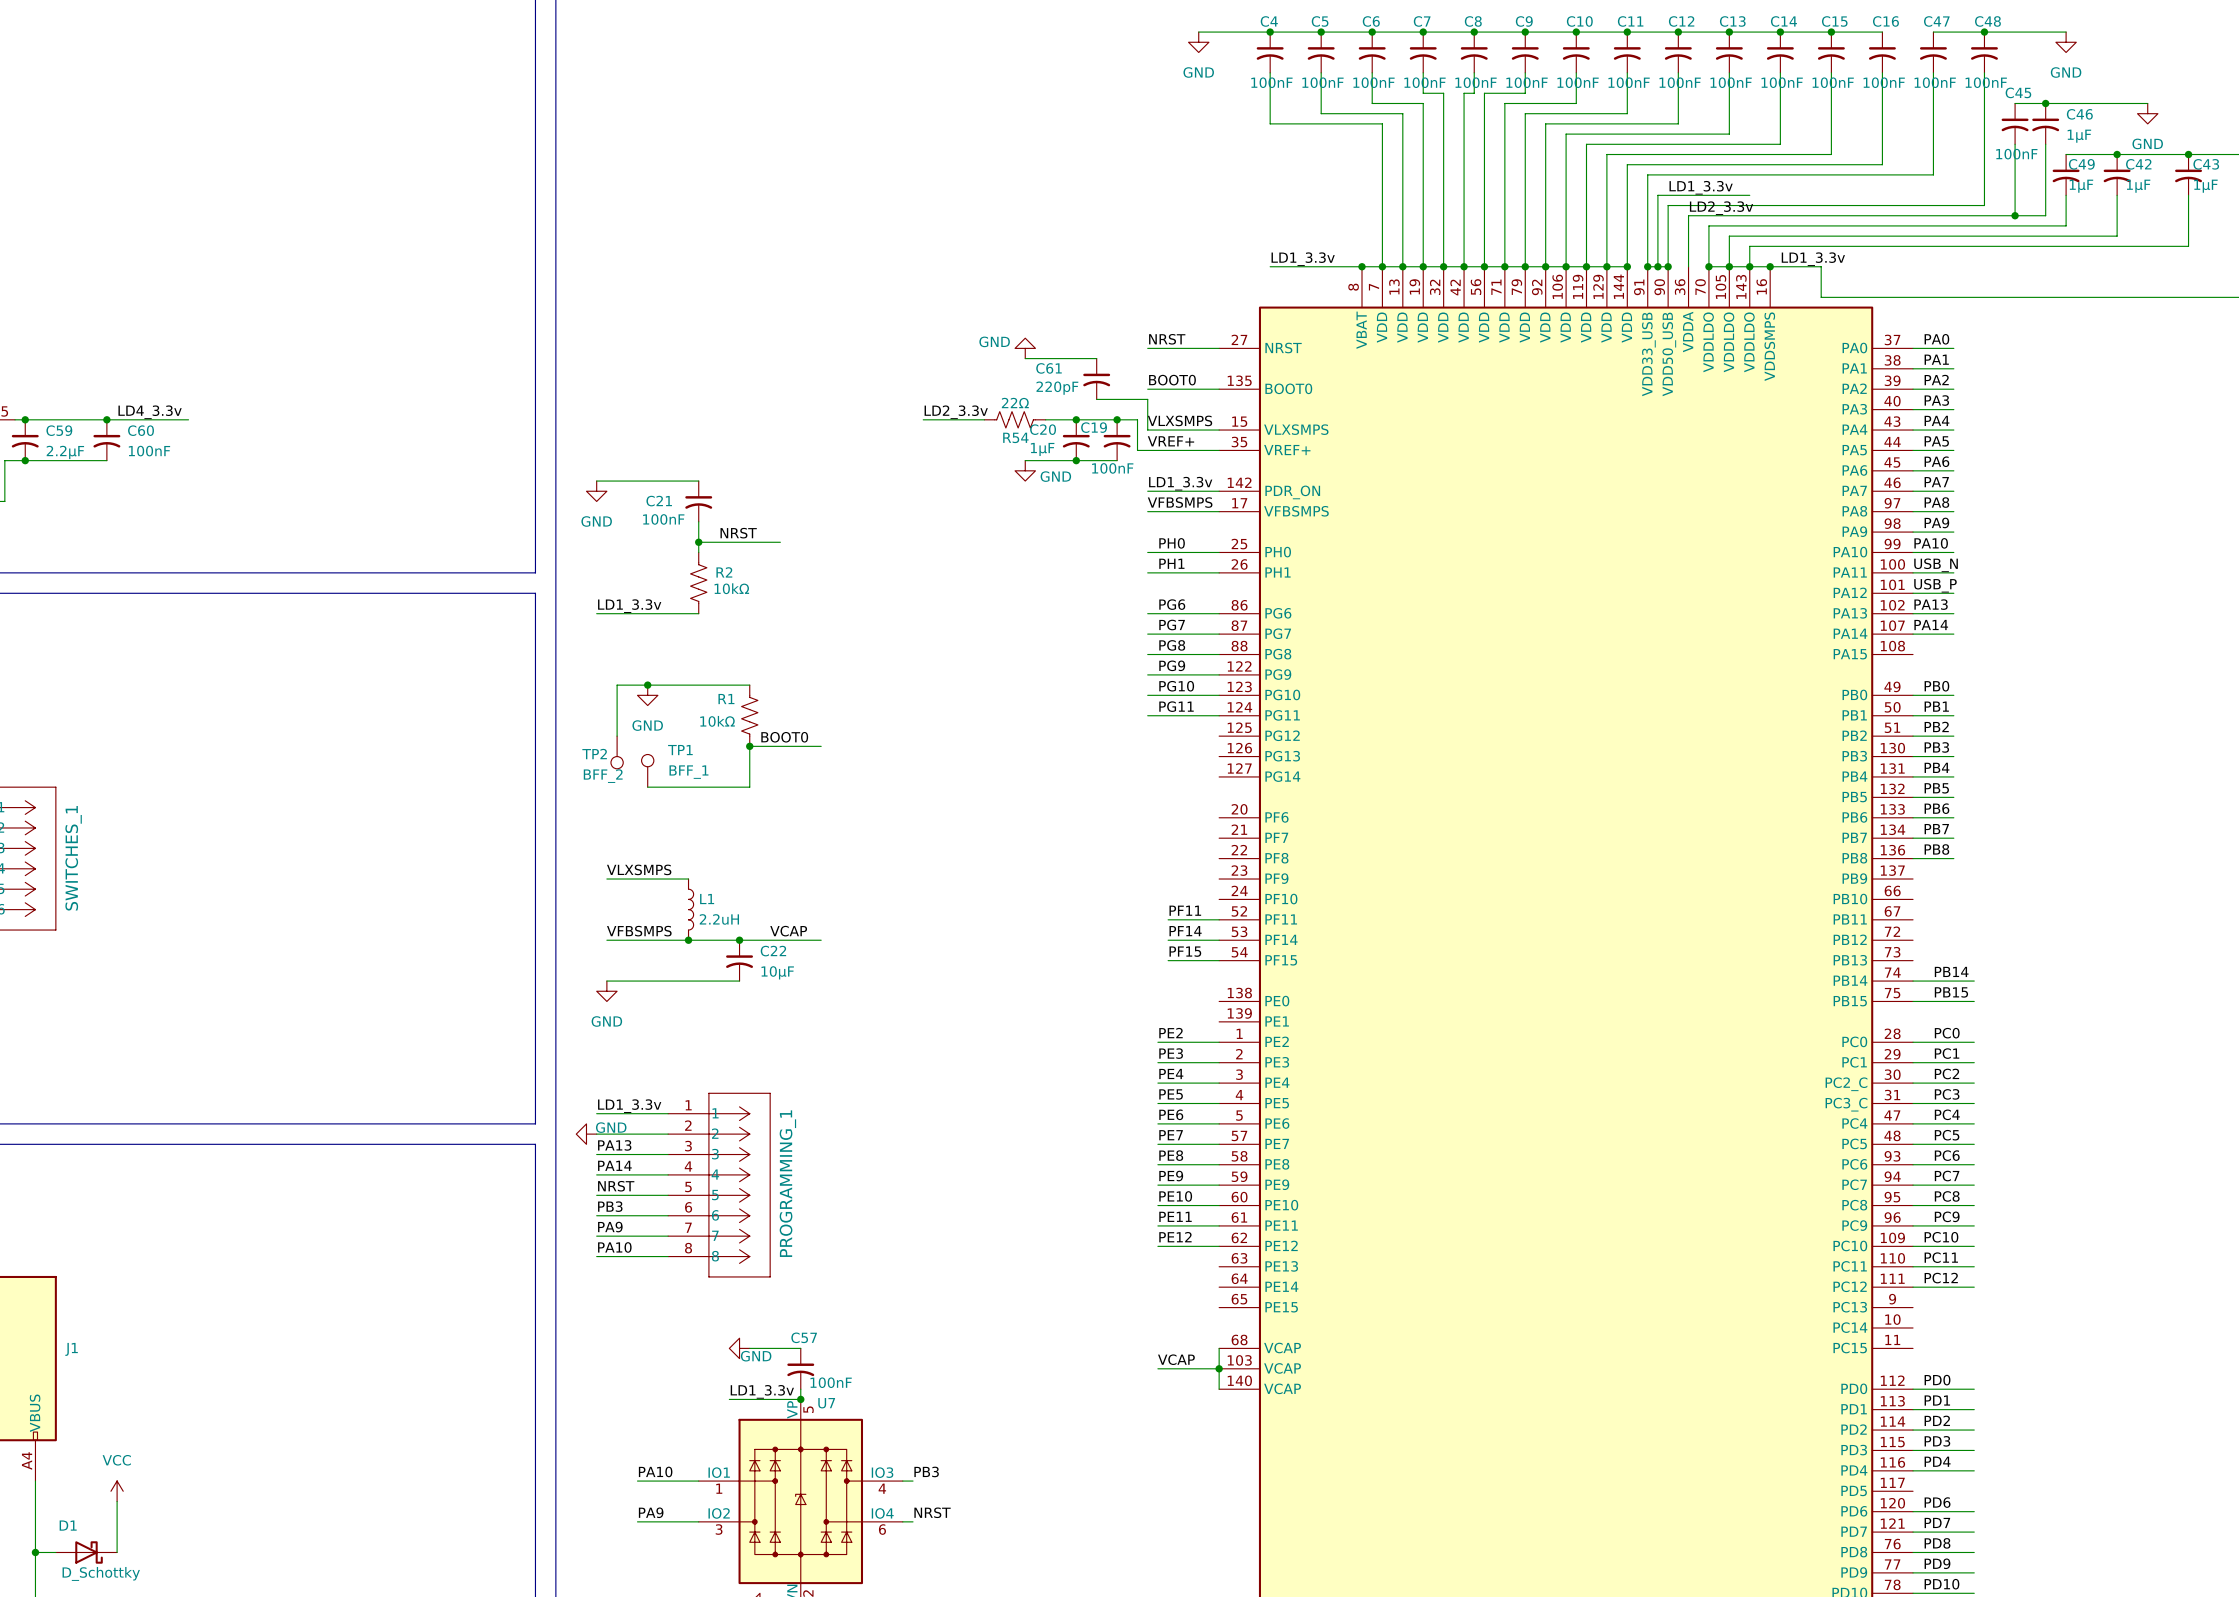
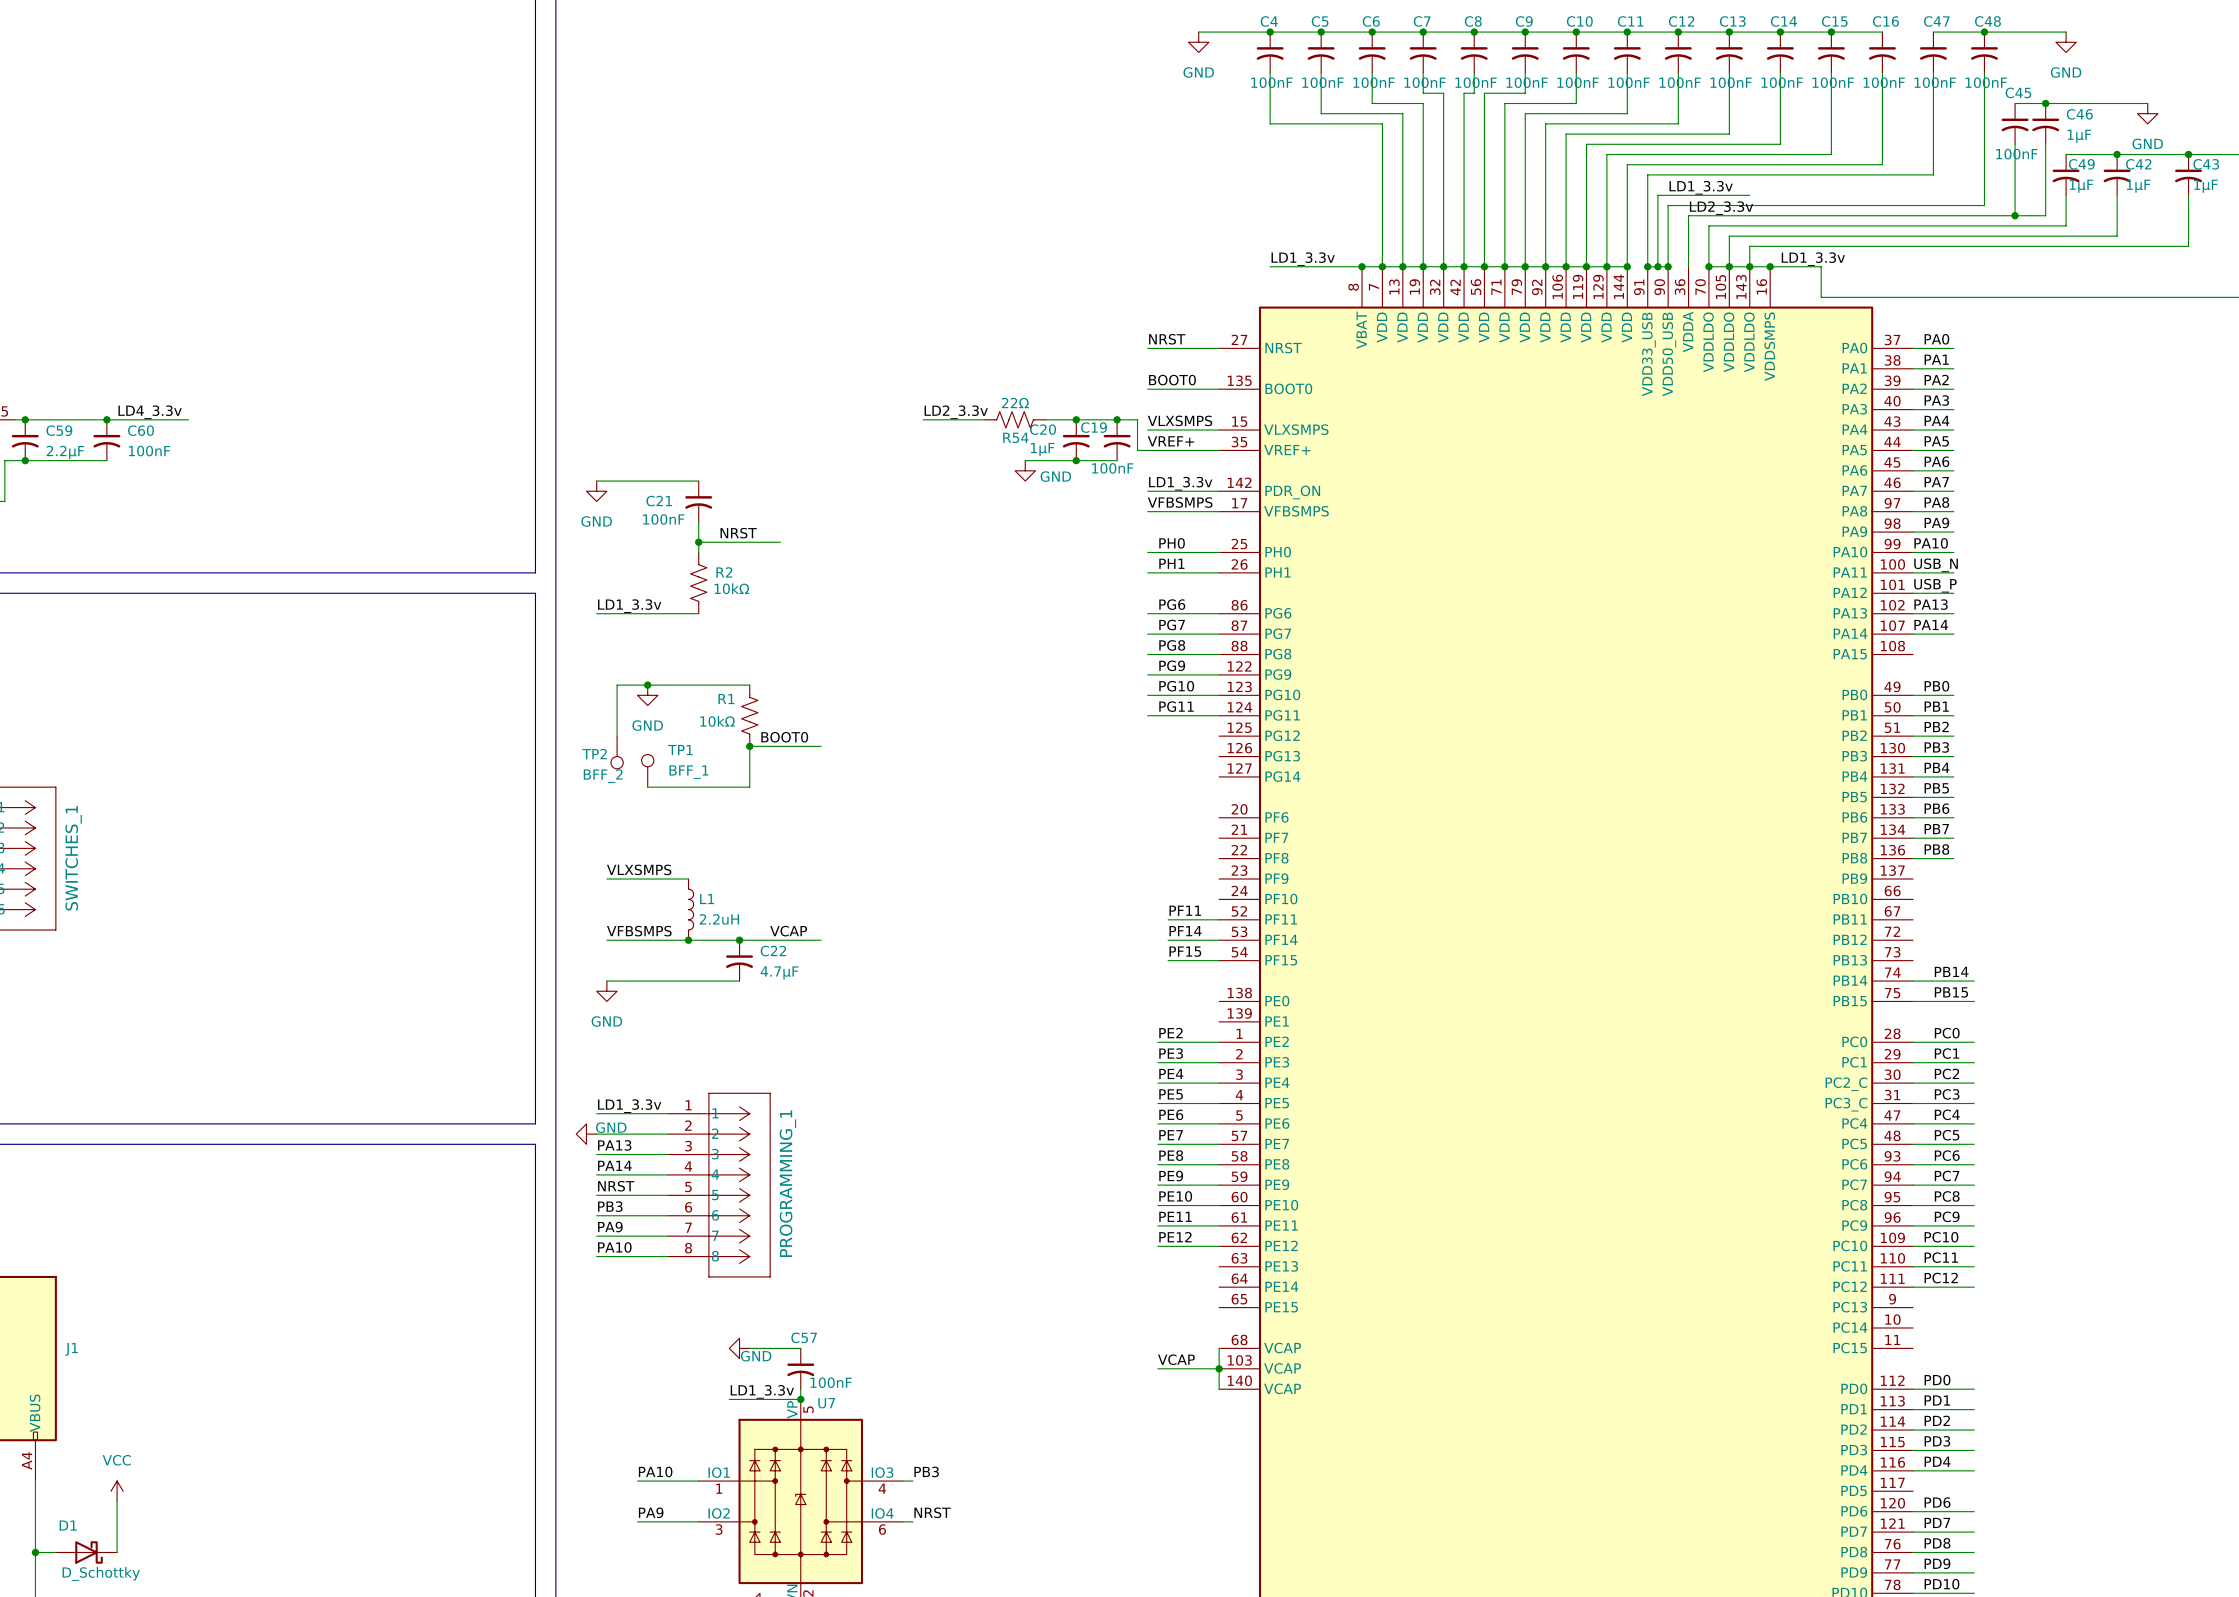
power symbol: GND (1025, 348) -> none
wire: (1025, 358) (1096, 358) -> none
C61: 220pF (1096, 379) -> none
wire: (1096, 399) (1147, 399) (1147, 430) -> none
C22 value: 10µF (777, 972) -> 4.7µF (779, 972)

